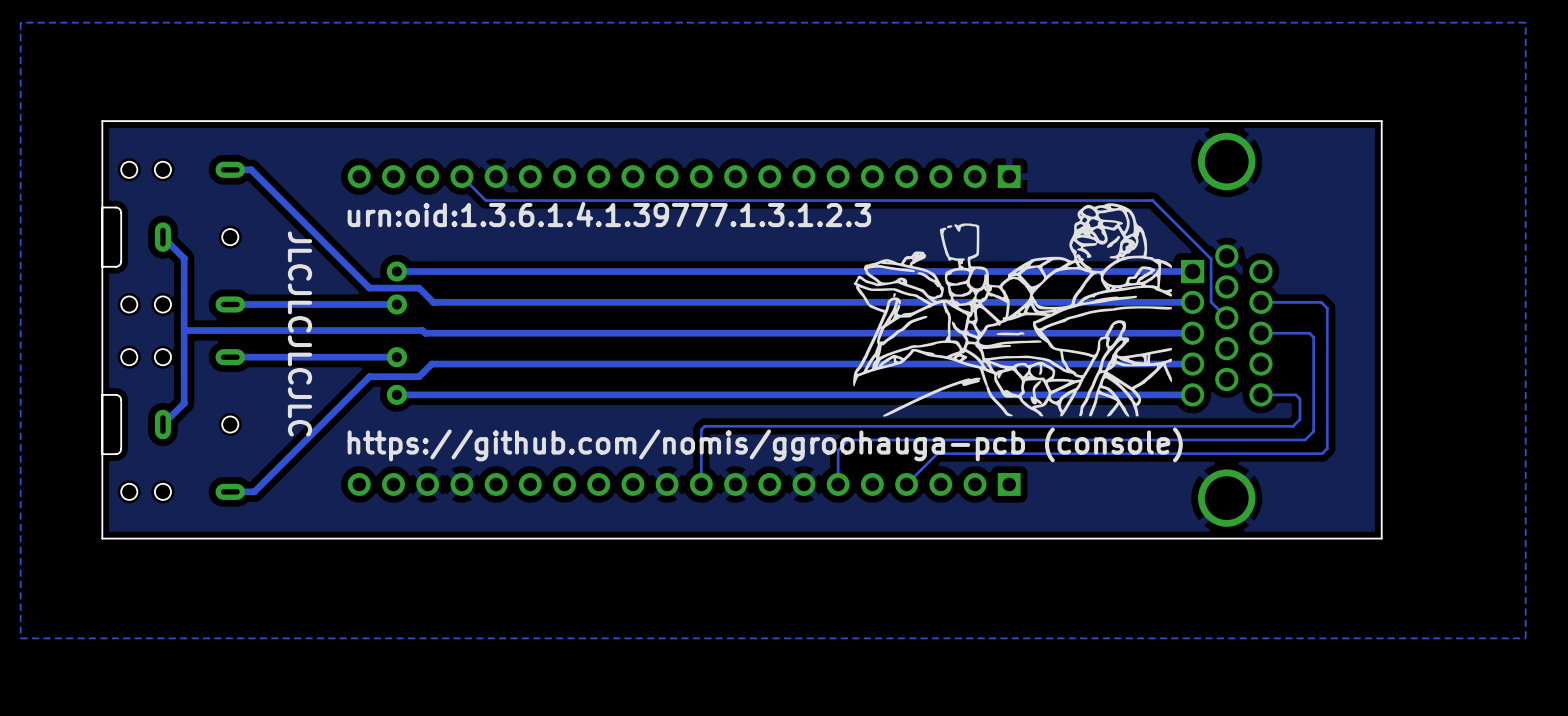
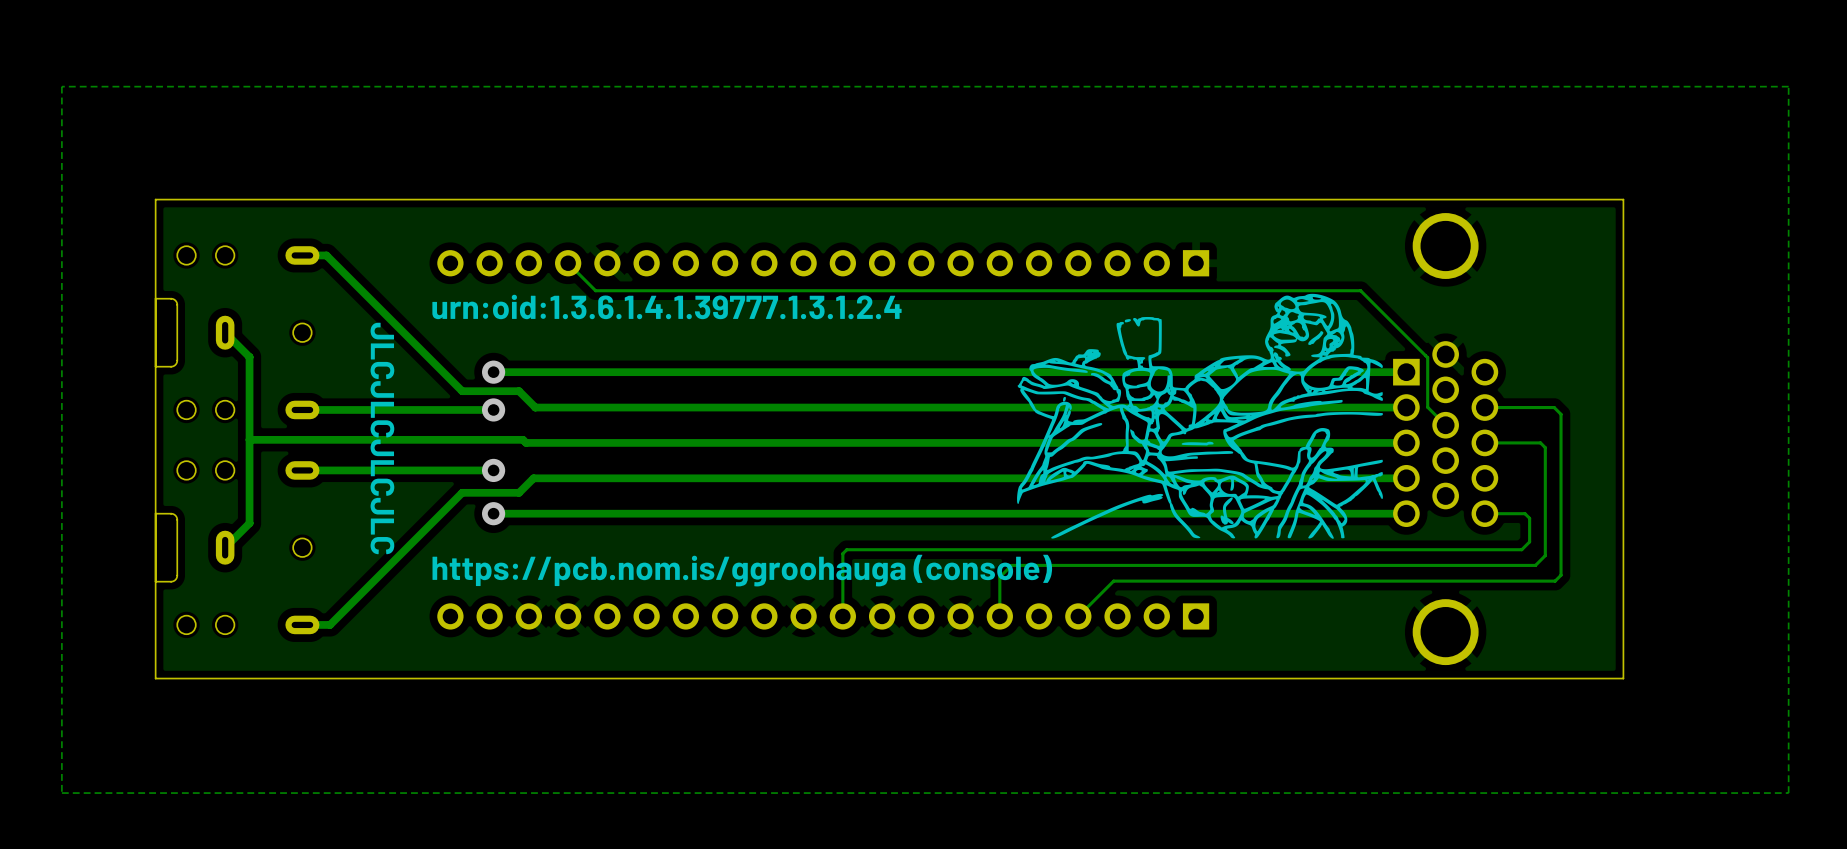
text: urn:oid:1.3.6.1.4.1.39777.1.3.1.2.3 (609, 214) -> urn:oid:1.3.6.1.4.1.39777.1.3.1.2.4 (666, 306)
text: https://github.com/nomis/ggroohauga-pcb (console) (765, 444) -> https://pcb.nom.is/ggroohauga (console) (742, 570)

